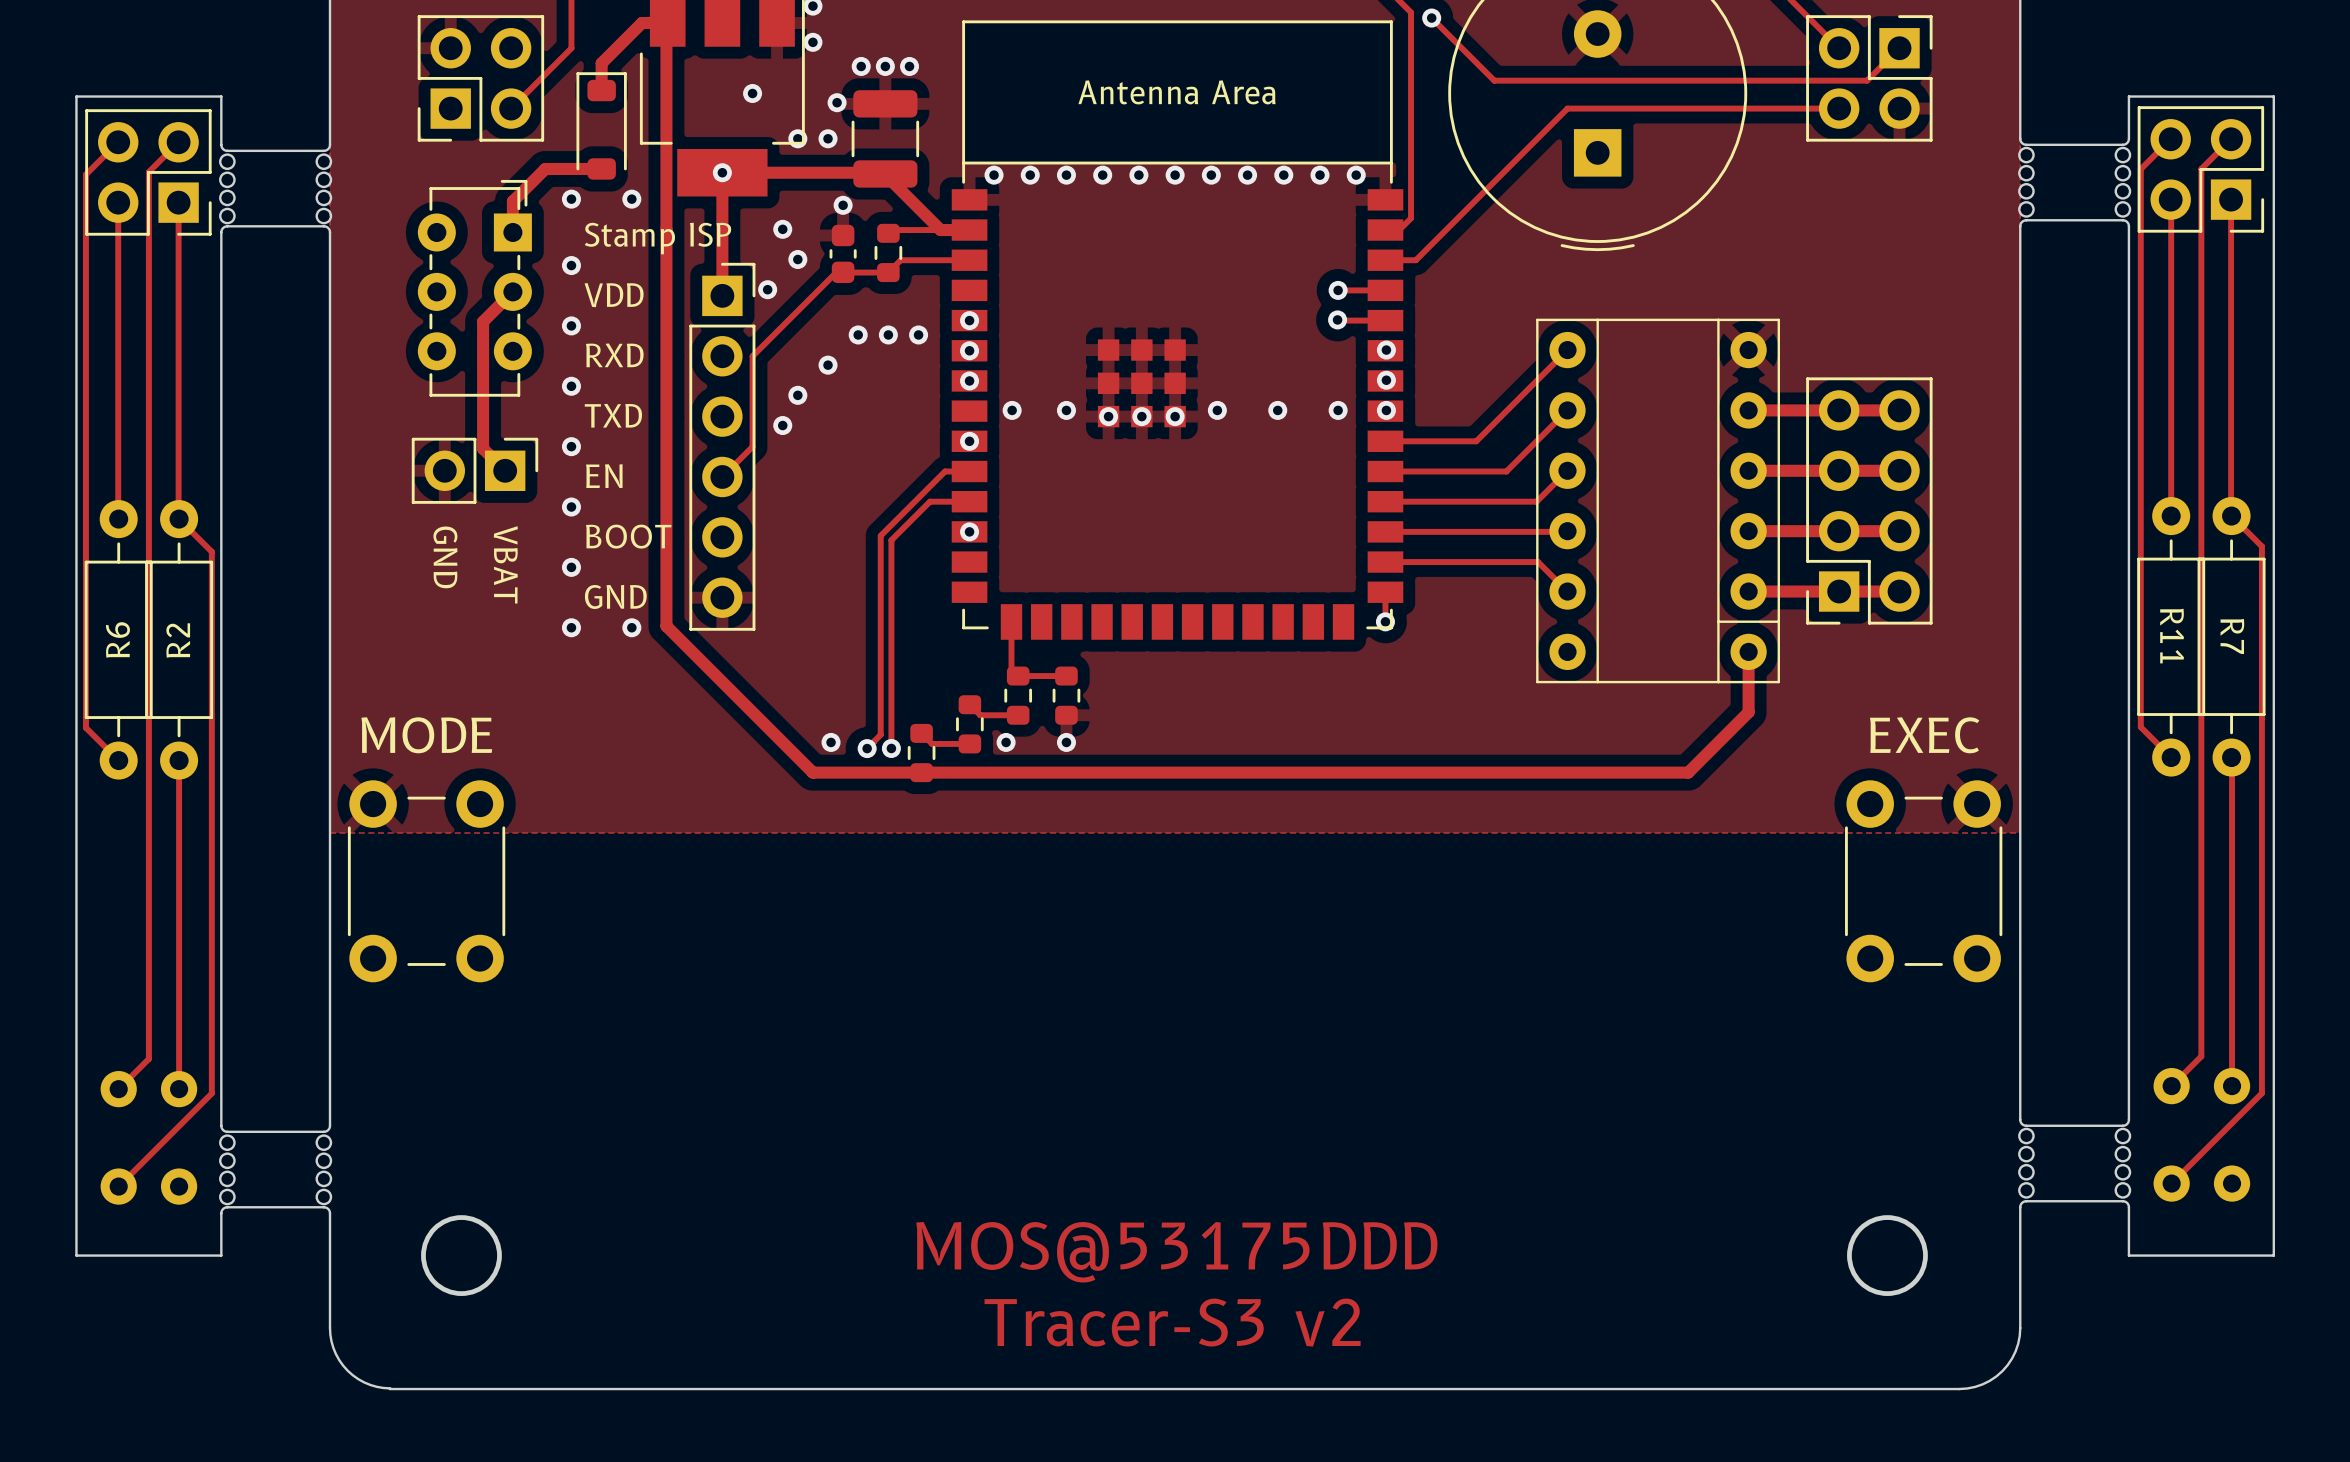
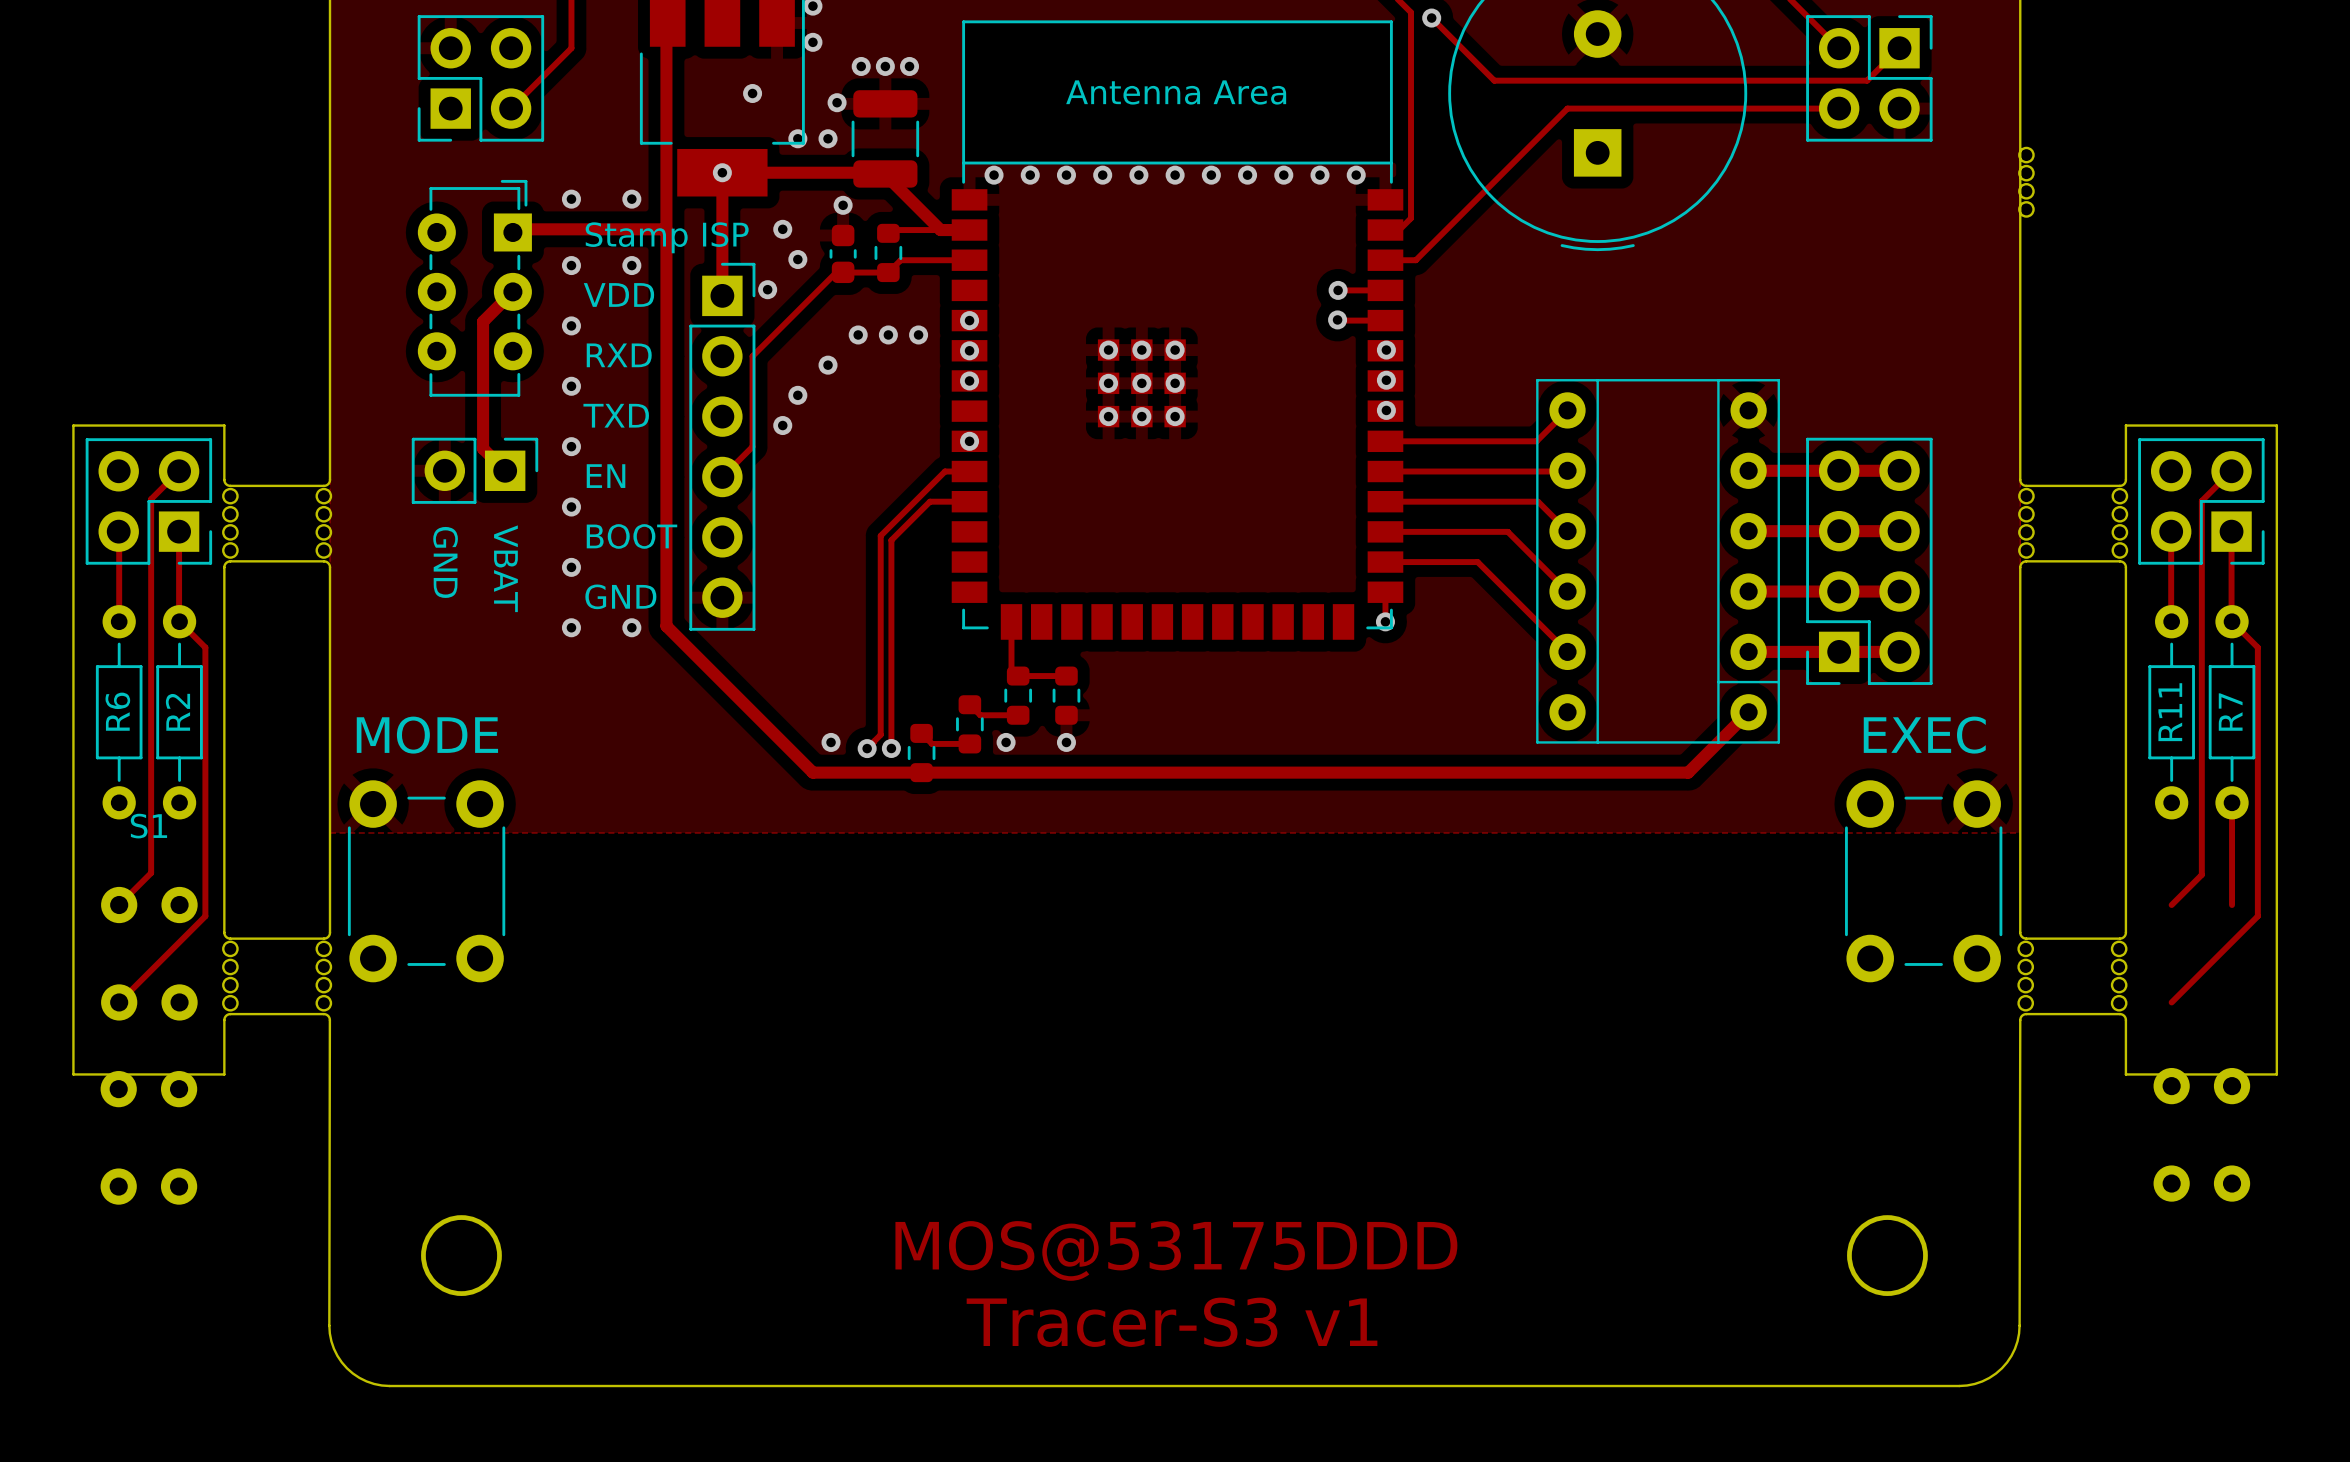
track: (667, 23) (641, 23) (601, 63) (601, 90) -> none
part: (601, 125) -> none
board edge: (2020, 138) (2022, 143) (2026, 144) (2125, 144) (2128, 139) (2128, 96) (2273, 96) (2273, 1255) (2128, 1255) (2128, 1207) (2125, 1202) (2023, 1201) (2020, 1207) (2020, 1328) (2018, 1343) (2012, 1358) (2002, 1371) (1989, 1380) (1967, 1388) (389, 1389) -> (2020, 138) (2020, 226)
track: (2170, 139) (2140, 169) (2140, 727) (2171, 757) -> none
track: (2231, 139) (2201, 168) (2201, 1056) (2171, 1086) -> none
track: (118, 142) (85, 174) (85, 727) (112, 754) (112, 760) -> none
track: (178, 142) (148, 171) (148, 1058) (118, 1089) -> none
board edge: (329, 144) (328, 149) (323, 150) (225, 150) (221, 145) (221, 96) (76, 96) (76, 1255) (221, 1255) (221, 1212) (225, 1207) (326, 1207) (329, 1213) (329, 1328) (333, 1347) (343, 1365) (358, 1379) (376, 1386) (390, 1388) -> (329, 144) (329, 232)
round board edge: [2114, 146, 2132, 164] -> none
round board edge: [219, 153, 236, 171] -> none
round board edge: [315, 153, 333, 171] -> none
round board edge: [2114, 164, 2132, 182] -> none
track: (601, 168) (545, 168) (512, 201) (512, 232) -> none
part position: (2200, 169) -> (2201, 501)
round board edge: [219, 171, 236, 189] -> none
round board edge: [315, 171, 333, 189] -> none
part position: (148, 172) -> (148, 501)
round board edge: [2114, 182, 2132, 200] -> none
round board edge: [219, 189, 236, 207] -> none
round board edge: [315, 189, 333, 207] -> none
track: (2170, 199) (2171, 519) -> none
track: (2231, 199) (2231, 515) (2261, 546) (2261, 1093) (2171, 1183) -> none
round board edge: [2114, 201, 2132, 218] -> none
track: (118, 202) (118, 513) (112, 519) -> none
track: (178, 202) (178, 518) (211, 551) (211, 1093) (118, 1186) -> none
round board edge: [219, 207, 236, 225] -> none
round board edge: [315, 207, 333, 225] -> none
board edge: (2020, 226) (2022, 222) (2026, 220) (2122, 220) (2128, 225) (2128, 1119) (2125, 1124) (2026, 1125) (2021, 1122) (2020, 932) -> (2020, 567) (2022, 563) (2026, 561) (2119, 561) (2124, 563) (2125, 567) (2125, 934) (2119, 938) (2026, 938) (2022, 936) (2020, 932)
track: none -> (511, 229) (666, 229)
board edge: (329, 232) (328, 228) (323, 226) (227, 226) (221, 231) (221, 1125) (224, 1131) (323, 1131) (329, 1128) (329, 932) -> (329, 567) (328, 563) (323, 561) (230, 561) (226, 563) (224, 567) (224, 934) (230, 938) (323, 938) (328, 936) (329, 932)
via: none -> (631, 265)
via: none -> (1108, 350)
via: none -> (1141, 350)
via: none -> (1175, 350)
track: (1567, 350) (1476, 441) -> (1536, 441) (1476, 441)
via: none -> (1108, 383)
via: none -> (1141, 383)
via: none -> (1175, 383)
via: (1012, 410) -> none
via: (1066, 410) -> none
via: (1217, 410) -> none
via: (1277, 410) -> none
via: (1338, 410) -> none
track: (1748, 410) (1899, 410) -> none
track: (1536, 441) (1506, 471) -> (1566, 471) (1506, 471)
track: none -> (179, 471) (151, 499) (151, 873) (119, 905)
track: (1566, 471) (1536, 501) -> none
track: none -> (2231, 471) (2201, 500) (2201, 874) (2171, 905)
board edge: (329, 479) (329, 567) -> (329, 479) (328, 484) (324, 485) (227, 485) (224, 479) (224, 425) (73, 425) (73, 1074) (224, 1074) (224, 1020) (227, 1014) (323, 1014) (328, 1015) (329, 1020) (329, 1333) (337, 1355) (347, 1368) (366, 1381) (389, 1386) (1959, 1386) (1974, 1383) (1989, 1377) (2001, 1368) (2011, 1355) (2019, 1333) (2020, 1020) (2022, 1015) (2026, 1014) (2122, 1014) (2125, 1020) (2125, 1074) (2276, 1074) (2276, 425) (2125, 425) (2125, 479) (2122, 485) (2026, 485) (2022, 484) (2020, 479)
board edge: (2020, 479) (2020, 567) -> none
round board edge: none -> [222, 487, 239, 505]
round board edge: none -> [315, 487, 333, 505]
round board edge: none -> [2018, 487, 2035, 505]
round board edge: none -> [2111, 487, 2129, 505]
R11 footprint: [2137, 497, 2206, 777] -> [2148, 605, 2195, 820]
R7 footprint: [2197, 497, 2266, 777] -> [2208, 605, 2256, 820]
R6 footprint: [84, 500, 153, 780] -> [95, 605, 143, 820]
R2 footprint: [145, 500, 214, 780] -> [156, 605, 203, 820]
part position: (1658, 500) -> (1658, 561)
part position: (1869, 500) -> (1869, 561)
round board edge: none -> [222, 505, 239, 523]
round board edge: none -> [315, 505, 333, 523]
round board edge: none -> [2018, 505, 2035, 523]
round board edge: none -> [2111, 505, 2129, 523]
round board edge: none -> [222, 524, 239, 541]
round board edge: none -> [315, 524, 333, 541]
round board edge: none -> [2018, 524, 2035, 541]
round board edge: none -> [2111, 524, 2129, 541]
track: none -> (118, 531) (119, 621)
track: none -> (179, 531) (179, 621) (205, 647) (205, 916) (119, 1002)
via: (969, 531) -> none
track: (1567, 531) (1507, 531) -> (1567, 531) (1536, 501)
track: none -> (2171, 531) (2171, 621)
track: none -> (2231, 531) (2231, 621) (2257, 647) (2257, 916) (2171, 1002)
round board edge: none -> [222, 542, 239, 559]
round board edge: none -> [315, 542, 333, 559]
round board edge: none -> [2018, 542, 2035, 559]
round board edge: none -> [2111, 542, 2129, 559]
track: (1477, 562) (1538, 562) -> (1507, 531) (1538, 562)
track: none -> (1477, 562) (1567, 651)
track: (1748, 651) (1748, 712) -> (1748, 651) (1899, 651)
track: (2231, 757) (2232, 802) -> none
track: (185, 760) (179, 766) (179, 1089) -> none
track: (2232, 905) (2232, 1086) -> none
round board edge: none -> [222, 940, 239, 958]
round board edge: none -> [315, 940, 333, 958]
round board edge: none -> [2017, 940, 2035, 958]
round board edge: none -> [2110, 940, 2128, 958]
S1: none -> (149, 953)
round board edge: none -> [222, 958, 239, 976]
round board edge: none -> [315, 958, 333, 976]
round board edge: none -> [2017, 958, 2035, 976]
round board edge: none -> [2110, 958, 2128, 976]
round board edge: none -> [222, 976, 239, 994]
round board edge: none -> [315, 976, 333, 994]
round board edge: none -> [2017, 976, 2035, 994]
round board edge: none -> [2110, 976, 2128, 994]
round board edge: none -> [222, 994, 239, 1012]
round board edge: none -> [315, 994, 333, 1012]
round board edge: none -> [2017, 994, 2035, 1012]
round board edge: none -> [2110, 994, 2128, 1012]
round board edge: [2018, 1127, 2035, 1145] -> none
round board edge: [2114, 1127, 2132, 1145] -> none
round board edge: [219, 1134, 236, 1151] -> none
round board edge: [315, 1134, 333, 1151] -> none
round board edge: [2018, 1145, 2035, 1163] -> none
round board edge: [2114, 1145, 2132, 1163] -> none
round board edge: [219, 1152, 236, 1170] -> none
round board edge: [315, 1152, 333, 1170] -> none
round board edge: [2018, 1163, 2035, 1181] -> none
round board edge: [2114, 1163, 2132, 1181] -> none
round board edge: [219, 1170, 236, 1188] -> none
round board edge: [315, 1170, 333, 1188] -> none
round board edge: [2018, 1182, 2035, 1199] -> none
round board edge: [2114, 1182, 2132, 1199] -> none
round board edge: [219, 1188, 236, 1206] -> none
round board edge: [315, 1188, 333, 1206] -> none
text: Tracer-S3 v2 (1172, 1322) -> Tracer-S3 v1 (1172, 1322)

